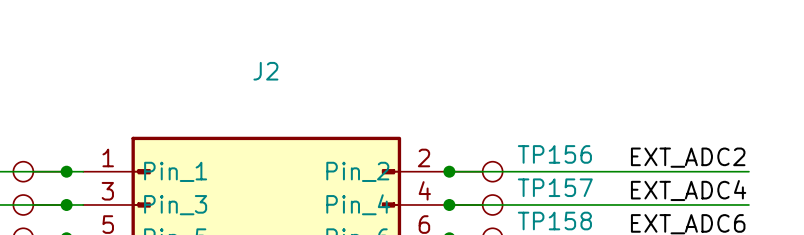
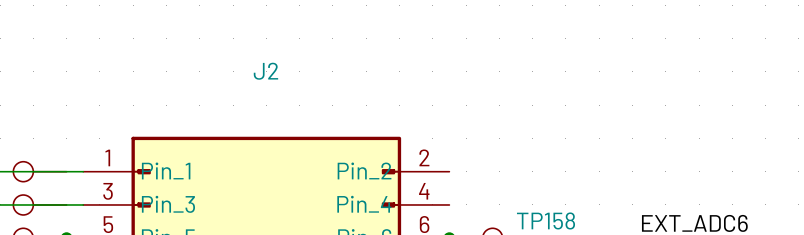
label: EXT_ADC2 (688, 157) -> none
junction: (66, 171) -> none
wire: (449, 171) (748, 171) -> none
junction: (449, 171) -> none
TP156: (476, 171) -> none
label: EXT_ADC4 (688, 190) -> none
junction: (66, 204) -> none
wire: (449, 204) (748, 204) -> none
junction: (449, 204) -> none
TP157: (476, 204) -> none

